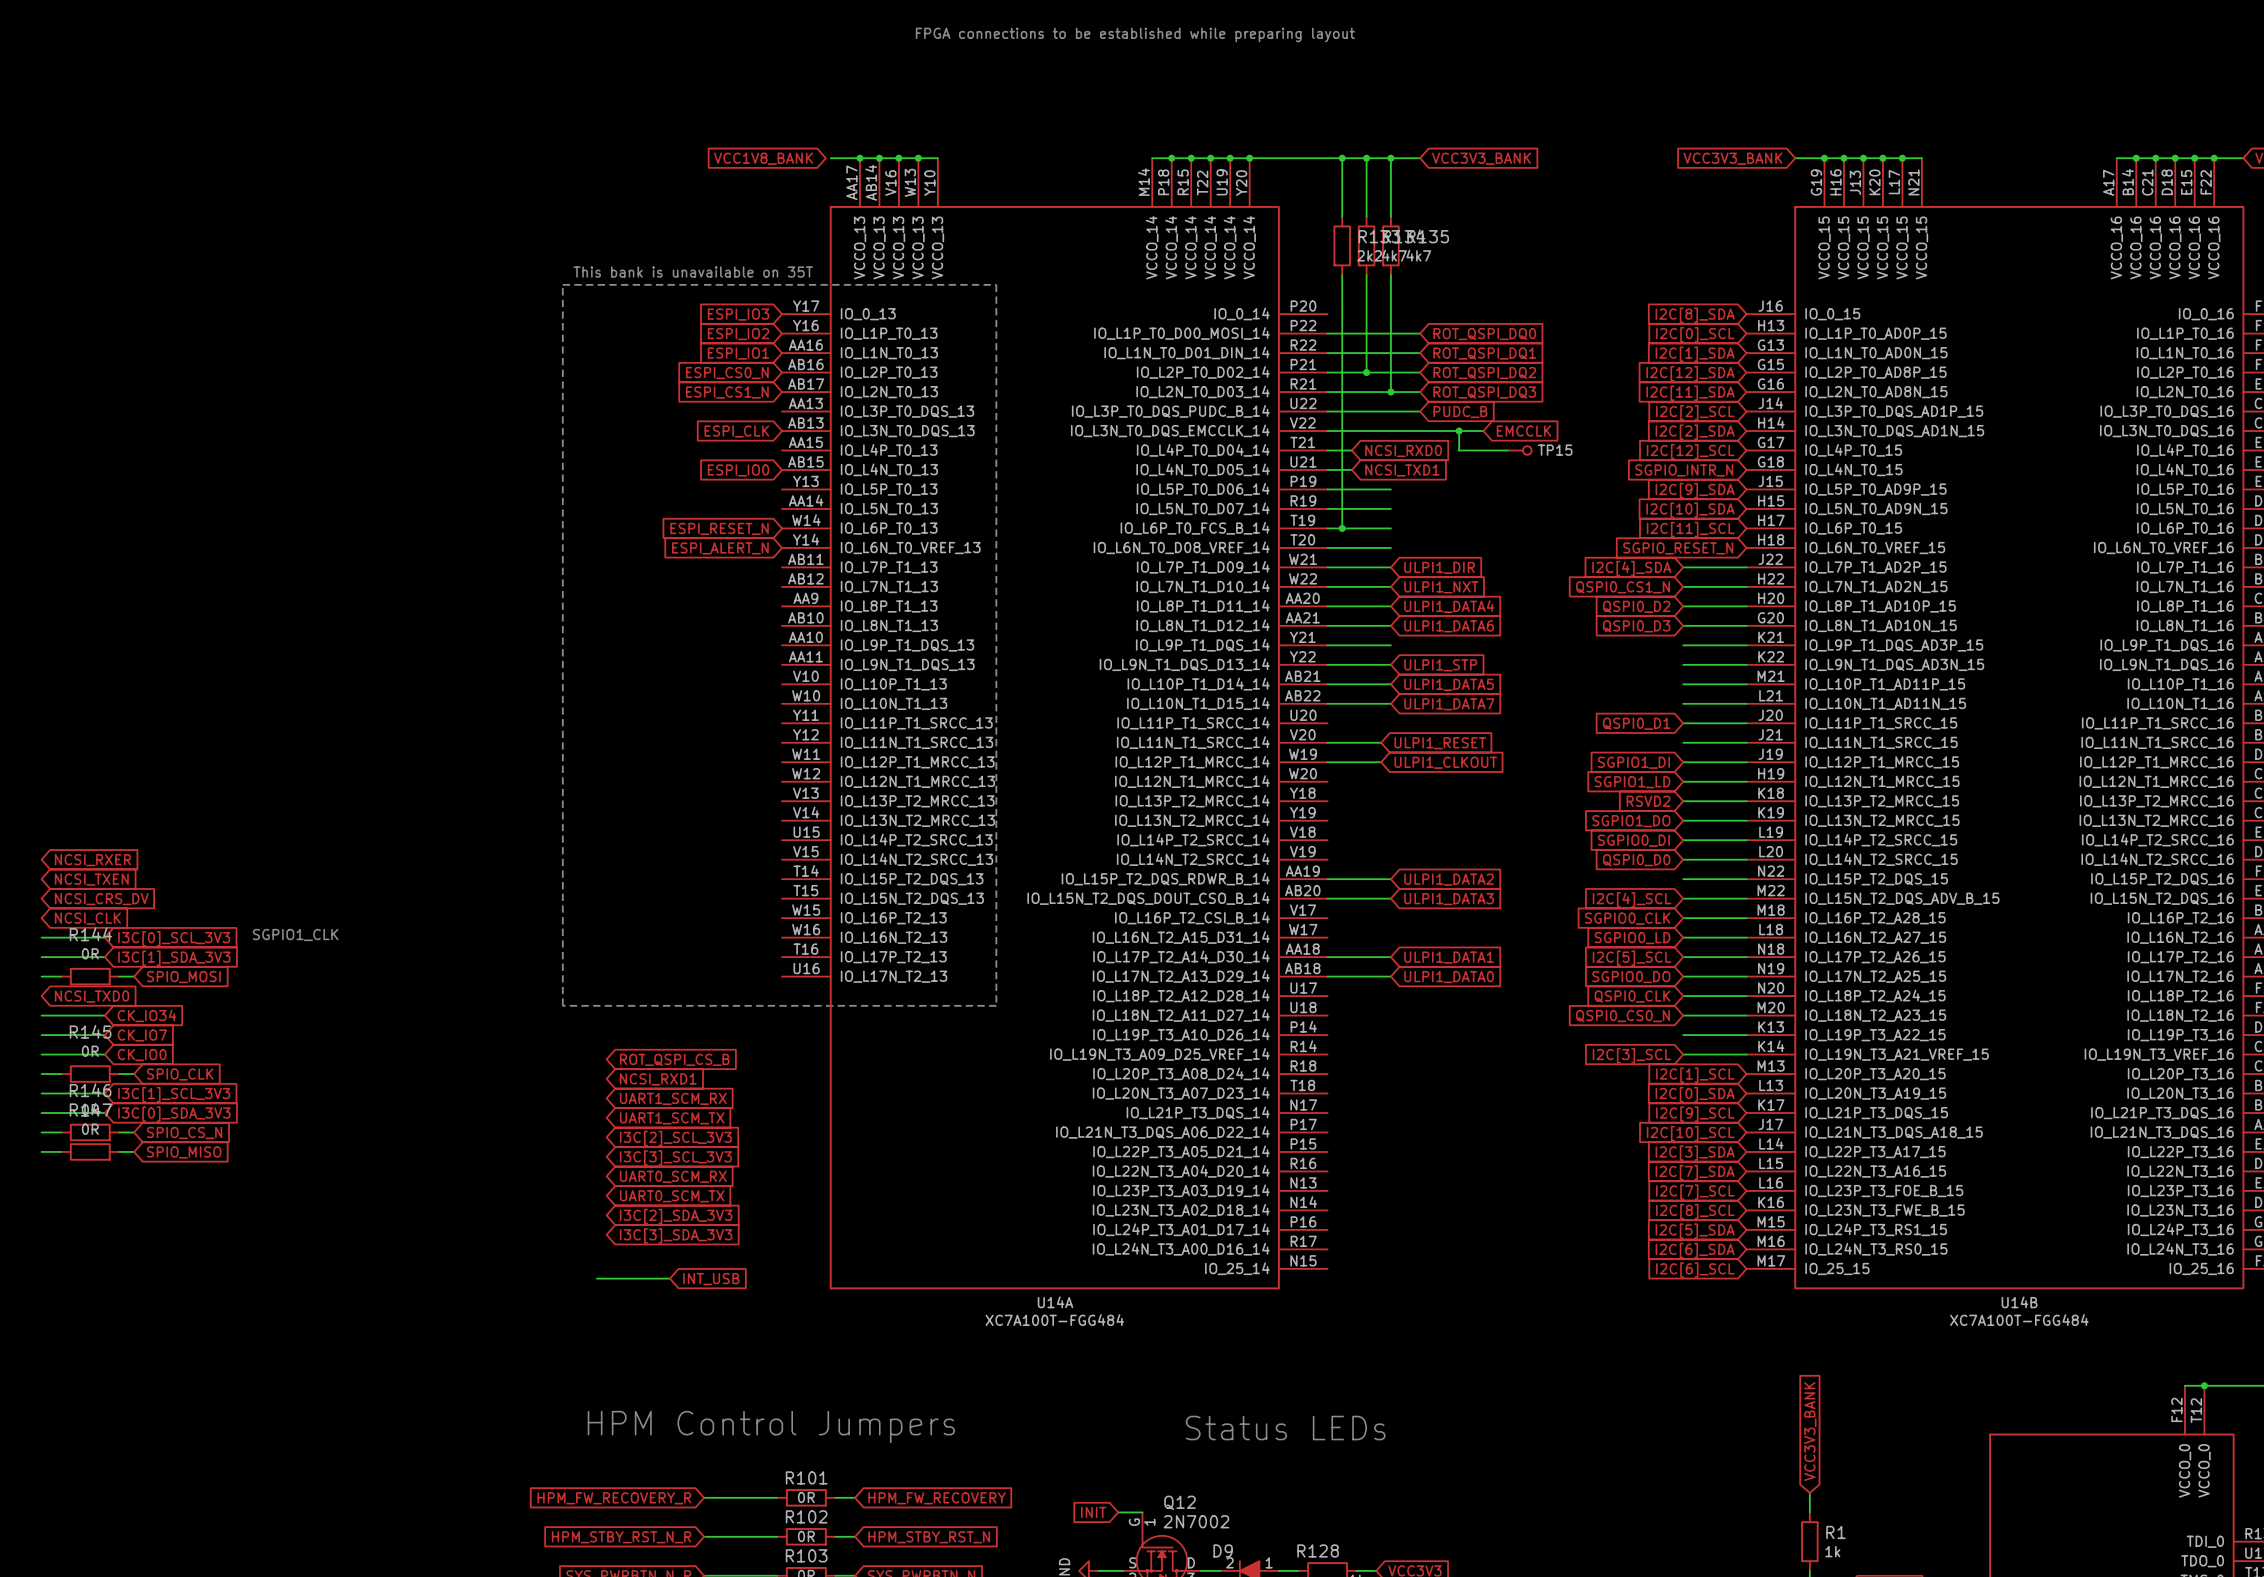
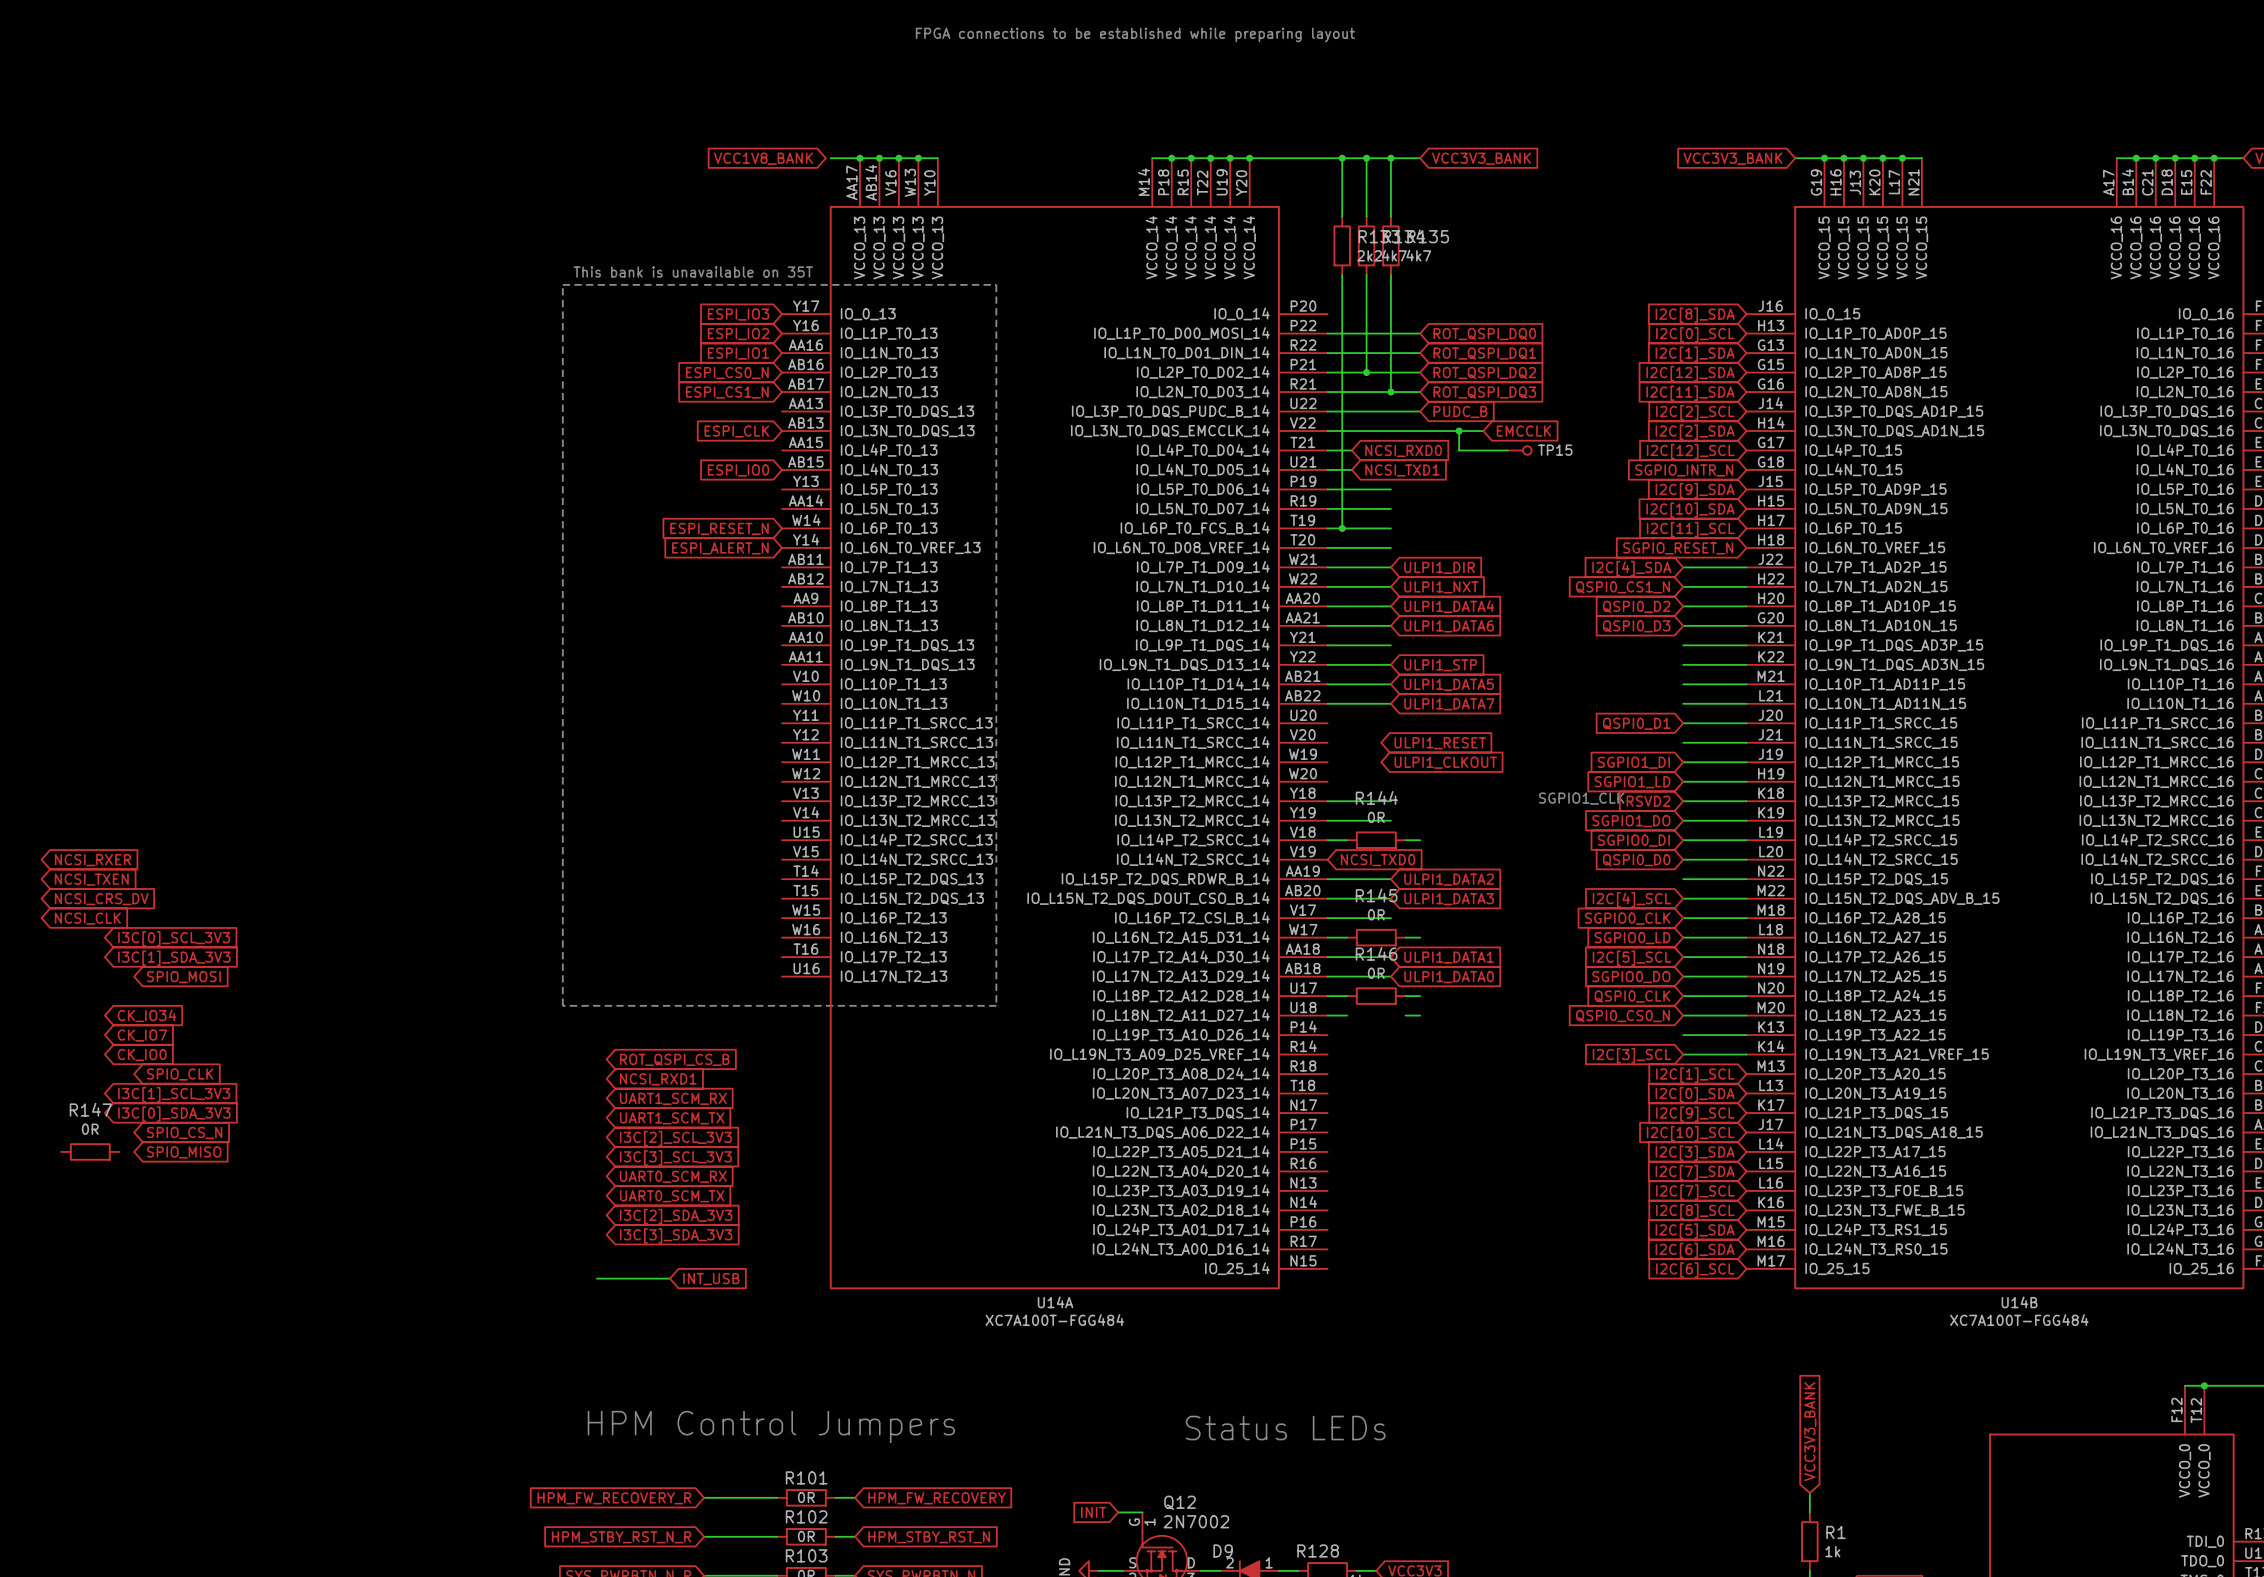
wire: (1327, 742) (1381, 742) -> none
wire: (1327, 762) (1381, 762) -> none
text: none -> SGPIO1_CLK (1581, 798)
wire: none -> (1327, 801) (1390, 801)
wire: none -> (1327, 820) (1390, 820)
wire: none -> (1327, 840) (1347, 840)
wire: none -> (1405, 840) (1420, 840)
global label: none -> NCSI_TXD0 (1378, 860)
wire: none -> (1327, 918) (1390, 918)
text: SGPIO1_CLK (295, 934) -> none
wire: (41, 937) (104, 937) -> none
wire: none -> (1327, 937) (1347, 937)
wire: none -> (1405, 937) (1420, 937)
wire: (41, 957) (104, 957) -> none
wire: (41, 976) (61, 976) -> none
R144 position: (90, 976) -> (1376, 840)
wire: (119, 976) (134, 976) -> none
global label: NCSI_TXD0 (92, 996) -> none
wire: none -> (1327, 996) (1347, 996)
wire: none -> (1405, 996) (1420, 996)
wire: (41, 1015) (104, 1015) -> none
wire: none -> (1327, 1015) (1347, 1015)
wire: none -> (1405, 1015) (1420, 1015)
wire: (41, 1035) (104, 1035) -> none
wire: (41, 1054) (104, 1054) -> none
wire: (41, 1074) (61, 1074) -> none
R145 position: (90, 1074) -> (1376, 937)
wire: (119, 1074) (134, 1074) -> none
wire: (41, 1093) (104, 1093) -> none
wire: (41, 1112) (104, 1112) -> none
wire: (41, 1132) (61, 1132) -> none
R146 position: (90, 1132) -> (1376, 996)
wire: (119, 1132) (134, 1132) -> none
wire: (41, 1151) (61, 1151) -> none
wire: (119, 1151) (134, 1151) -> none

